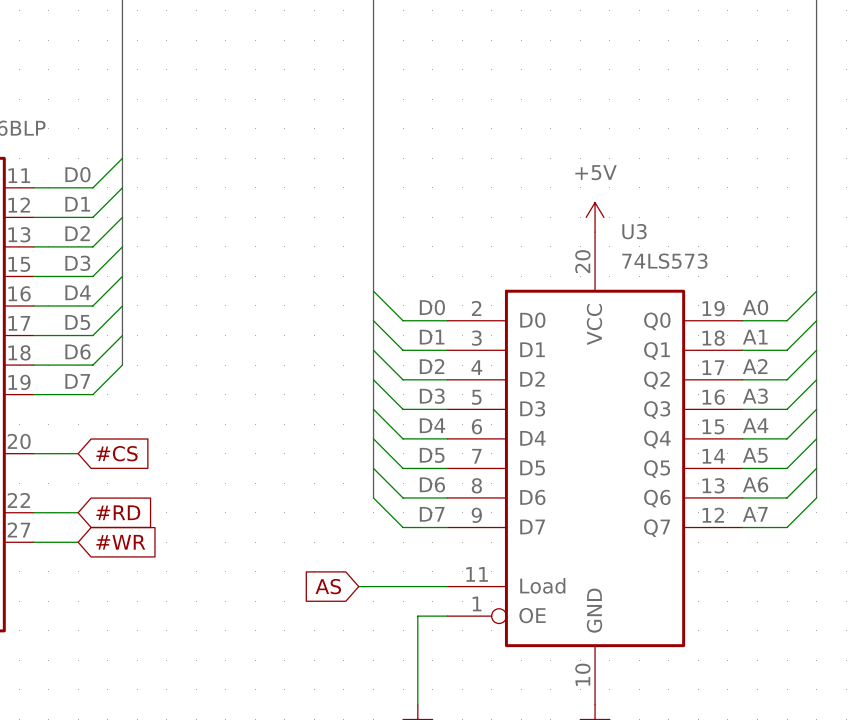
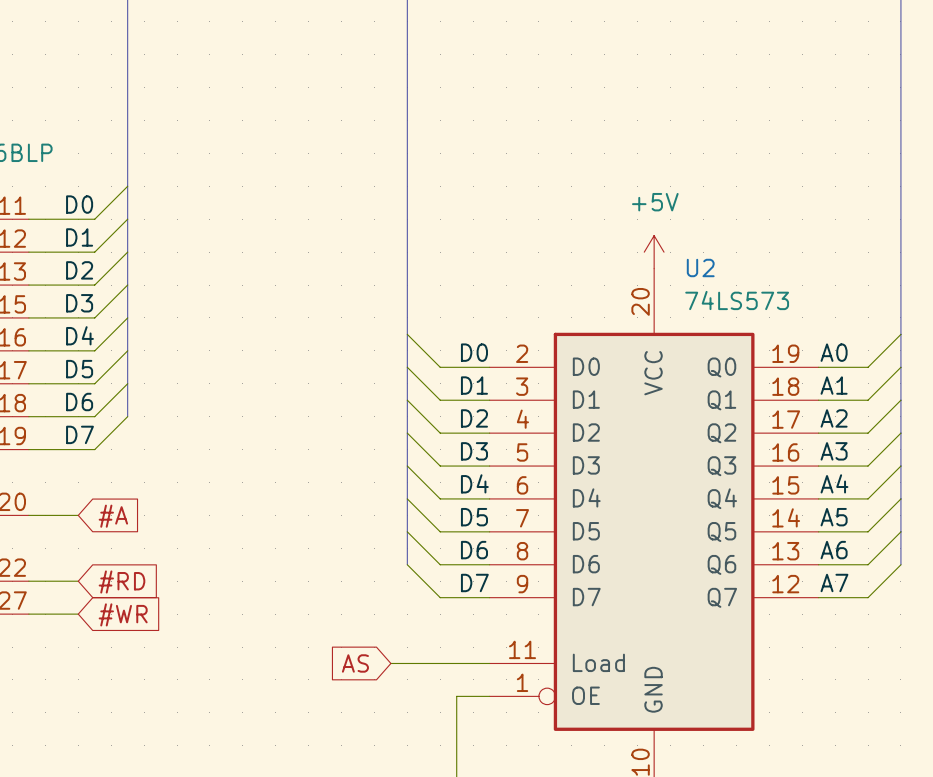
U3 name: U3 (634, 231) -> U2 (700, 267)
global label: #CS (116, 453) -> #A (113, 516)

